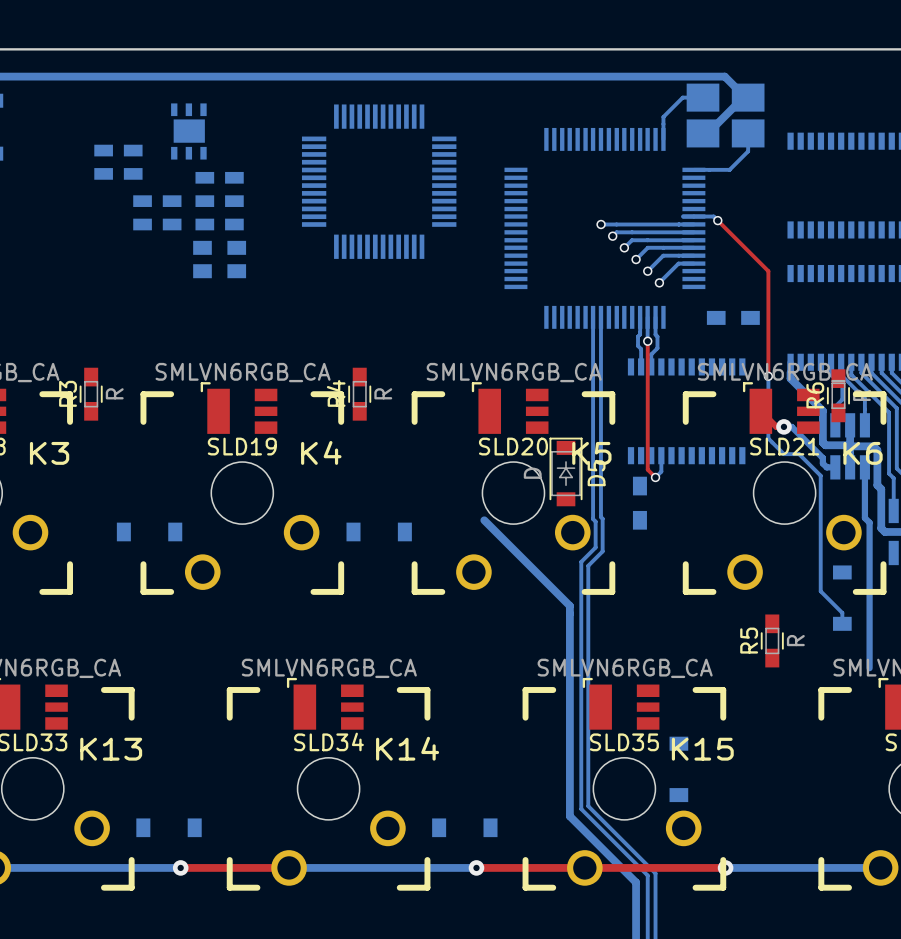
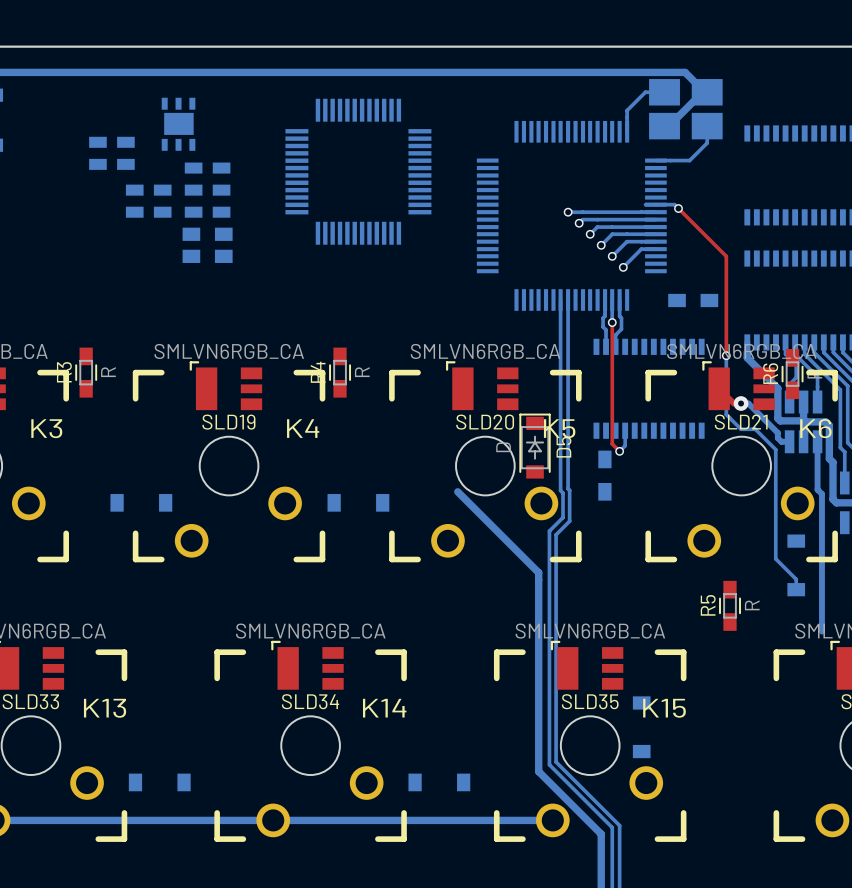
bottom track: none -> (170, 820) (273, 820)
top track: (180, 867) (289, 867) -> none
via: (180, 867) -> none
bottom track: none -> (450, 820) (552, 820)
top track: (476, 867) (725, 867) -> none
via: (476, 867) -> none
bottom track: (725, 867) (880, 867) -> none
via: (725, 867) -> none

